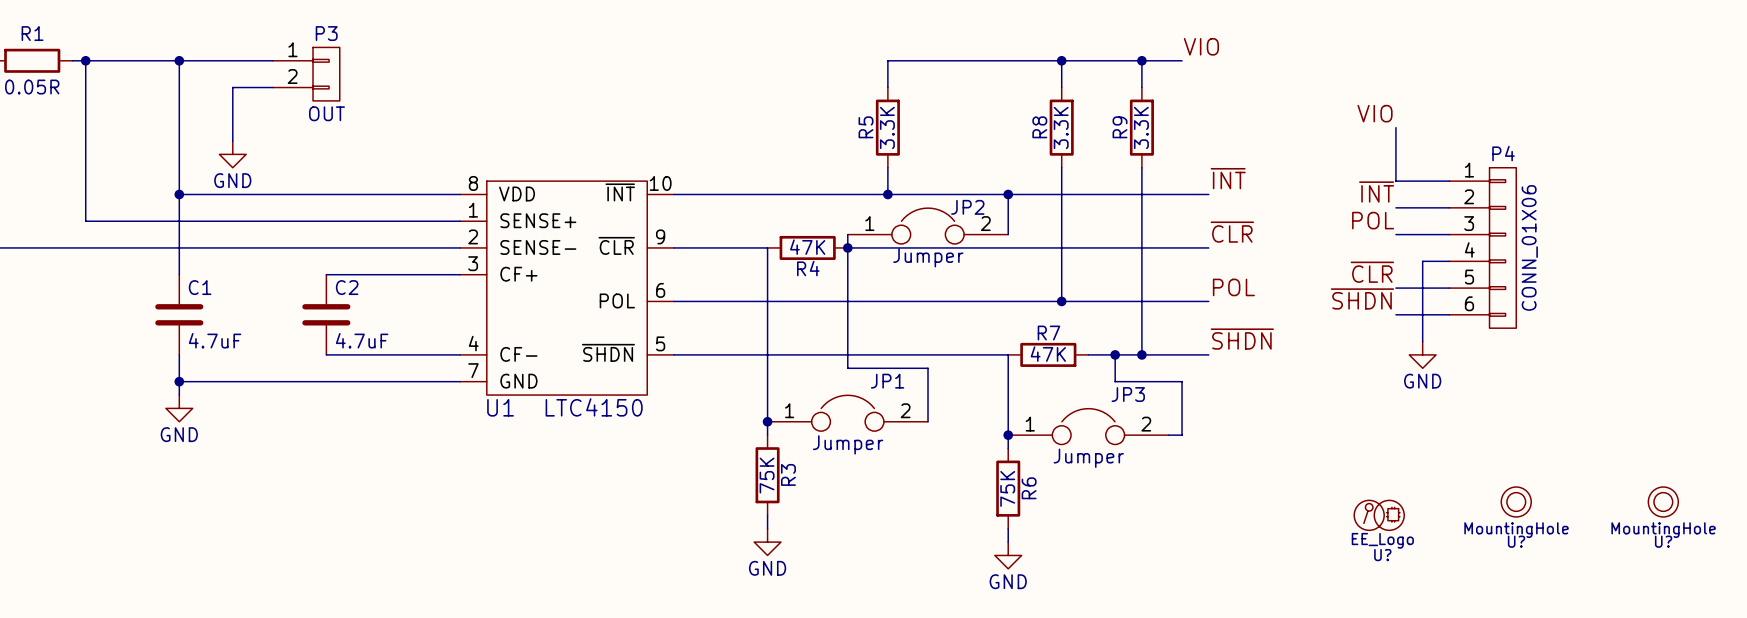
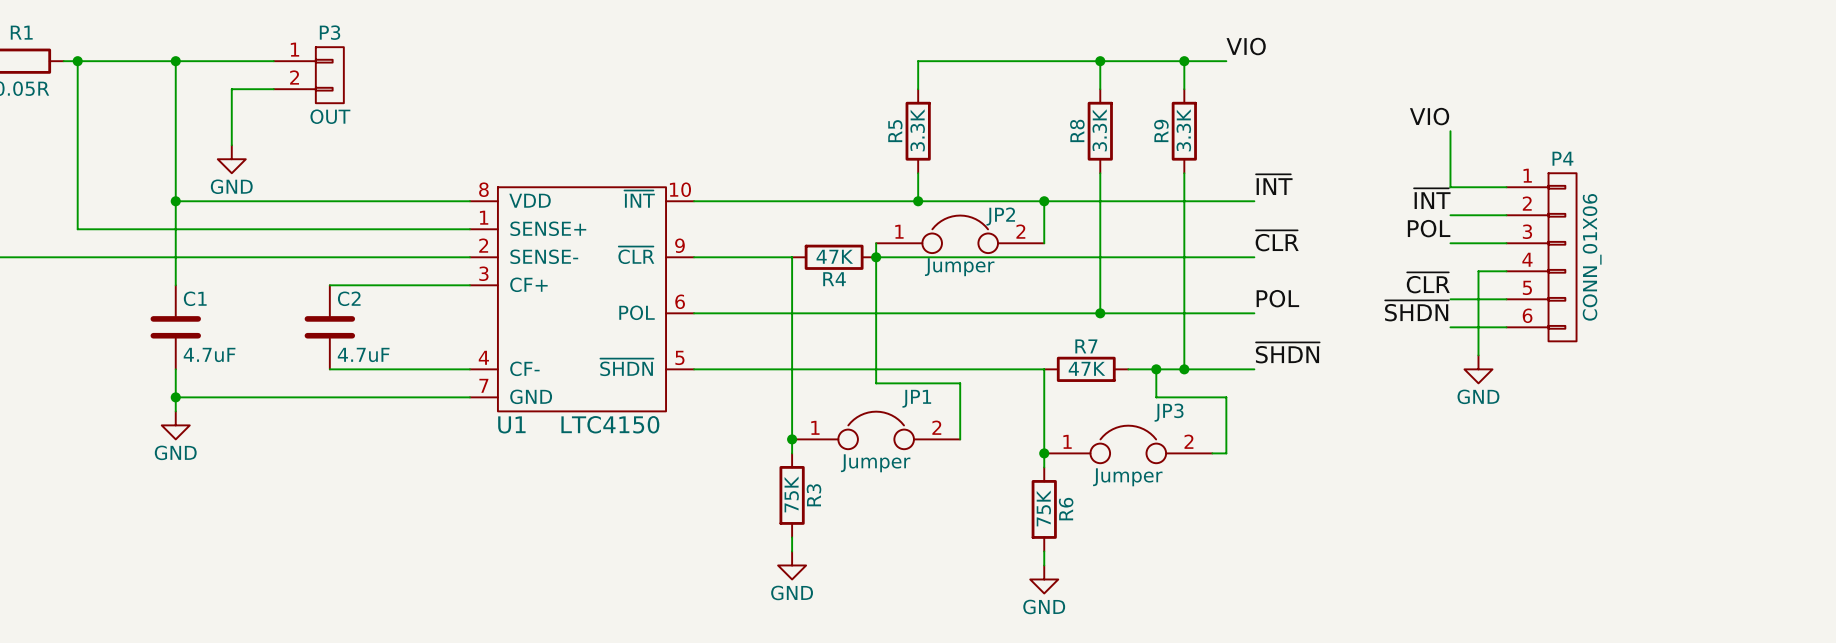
U?: MountingHole (1516, 501) -> none
U?: MountingHole (1663, 501) -> none
U?: EE_Logo (1379, 515) -> none

